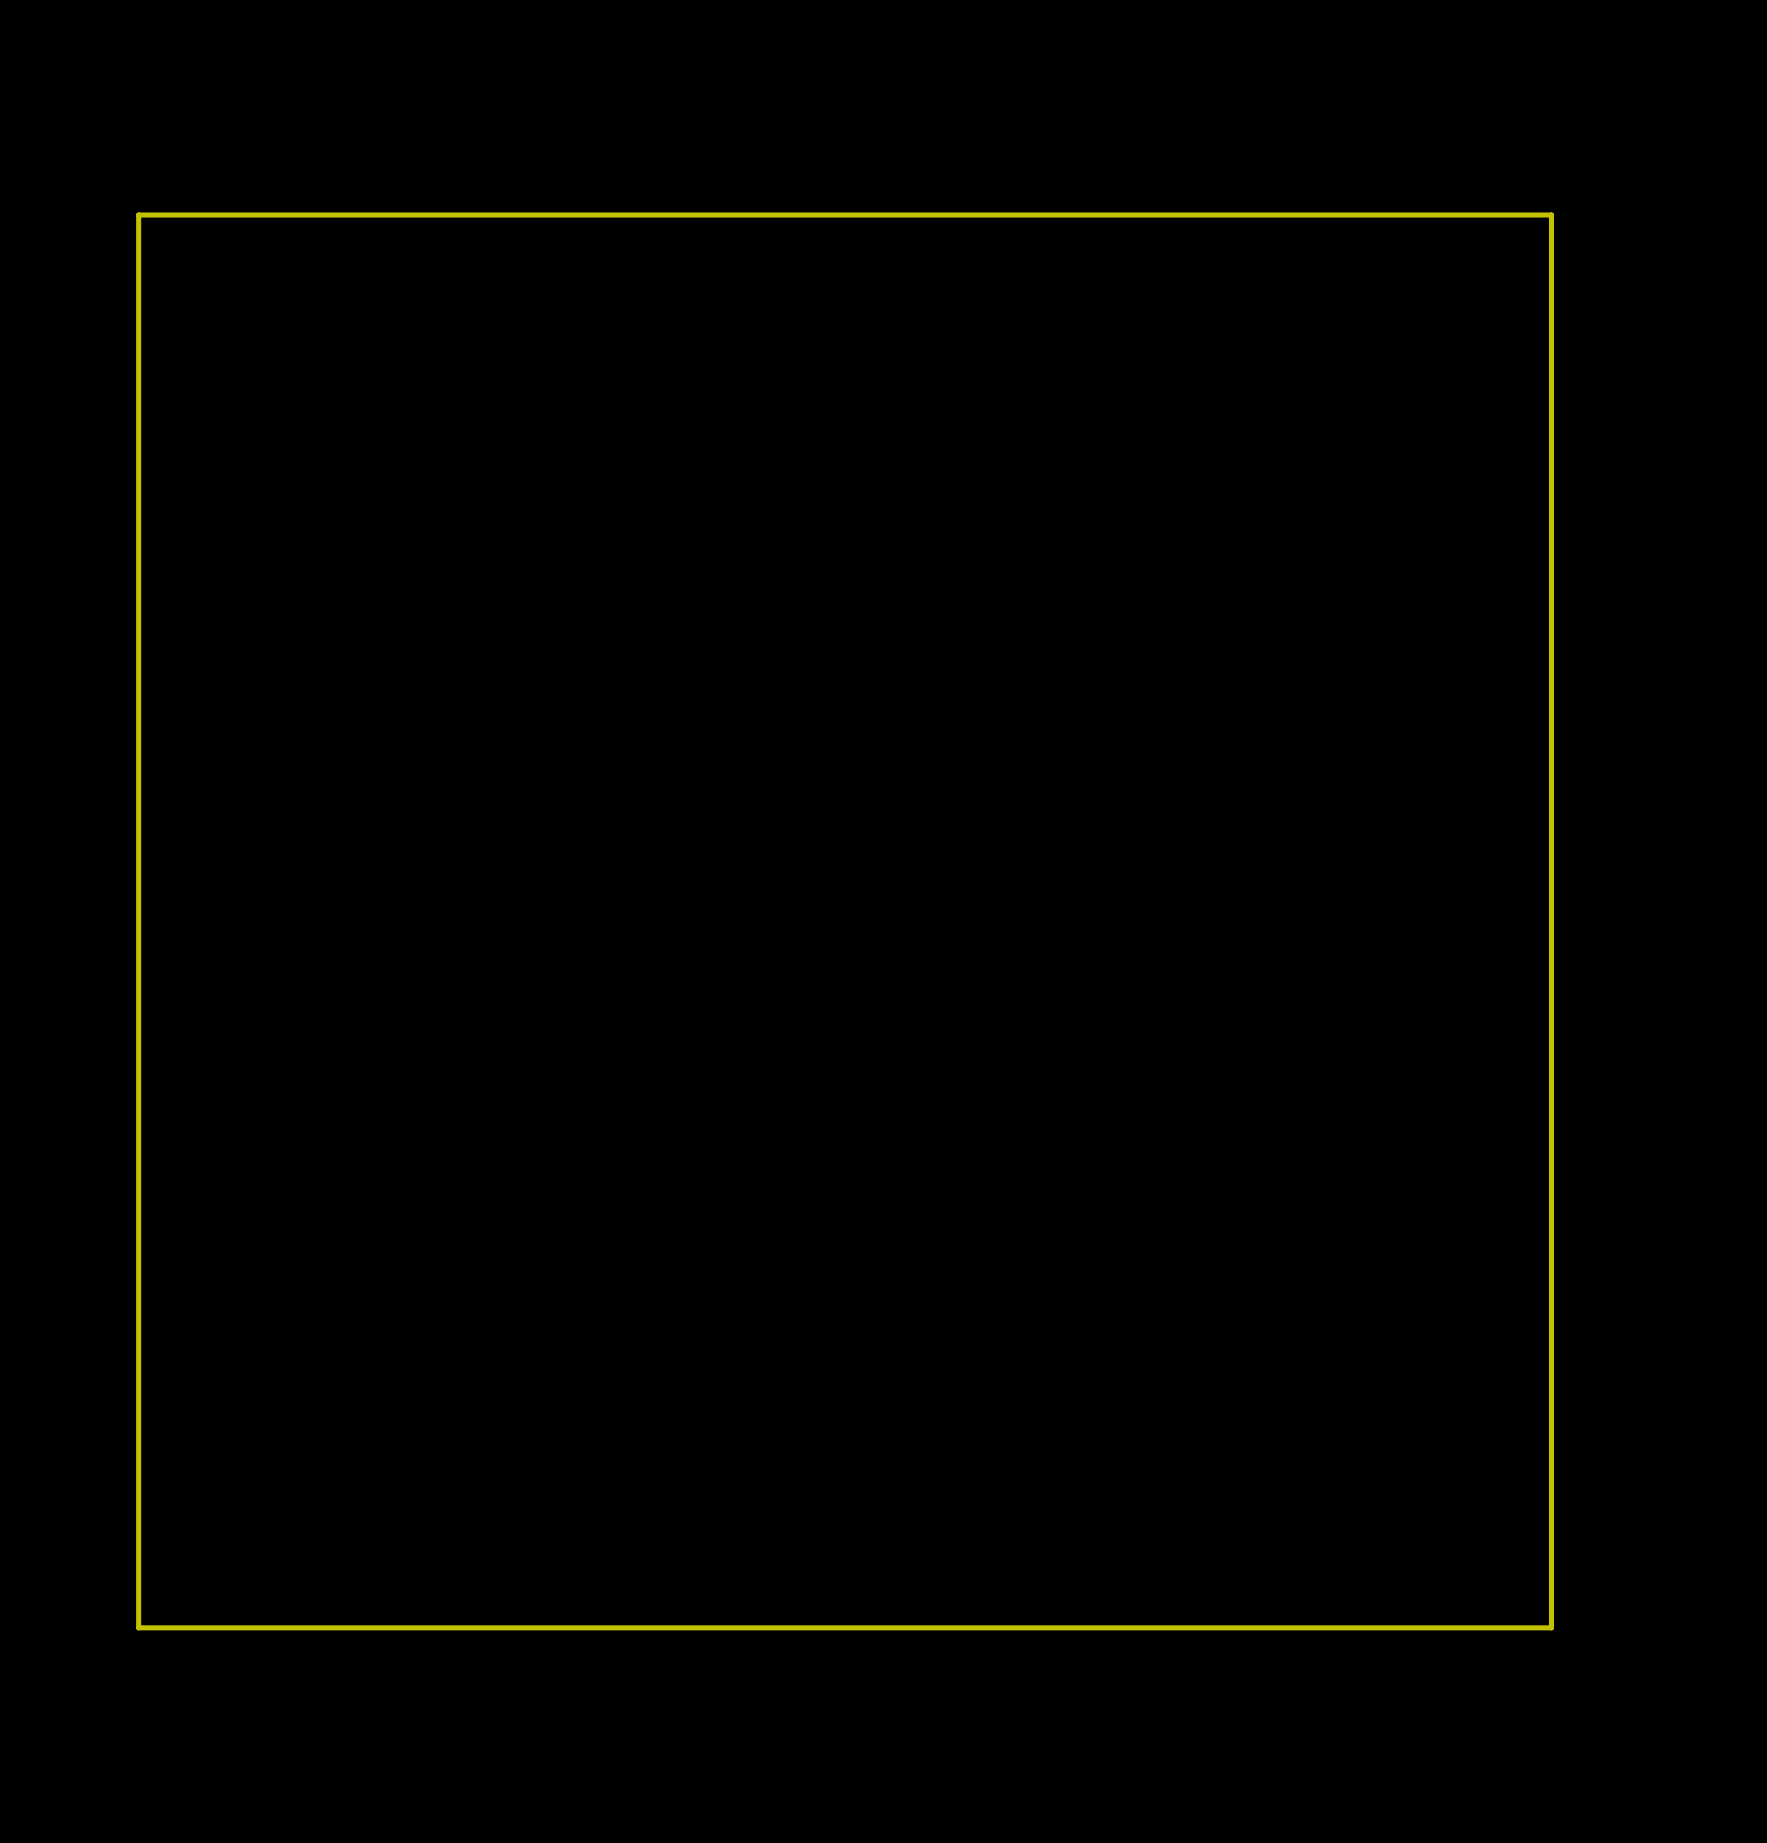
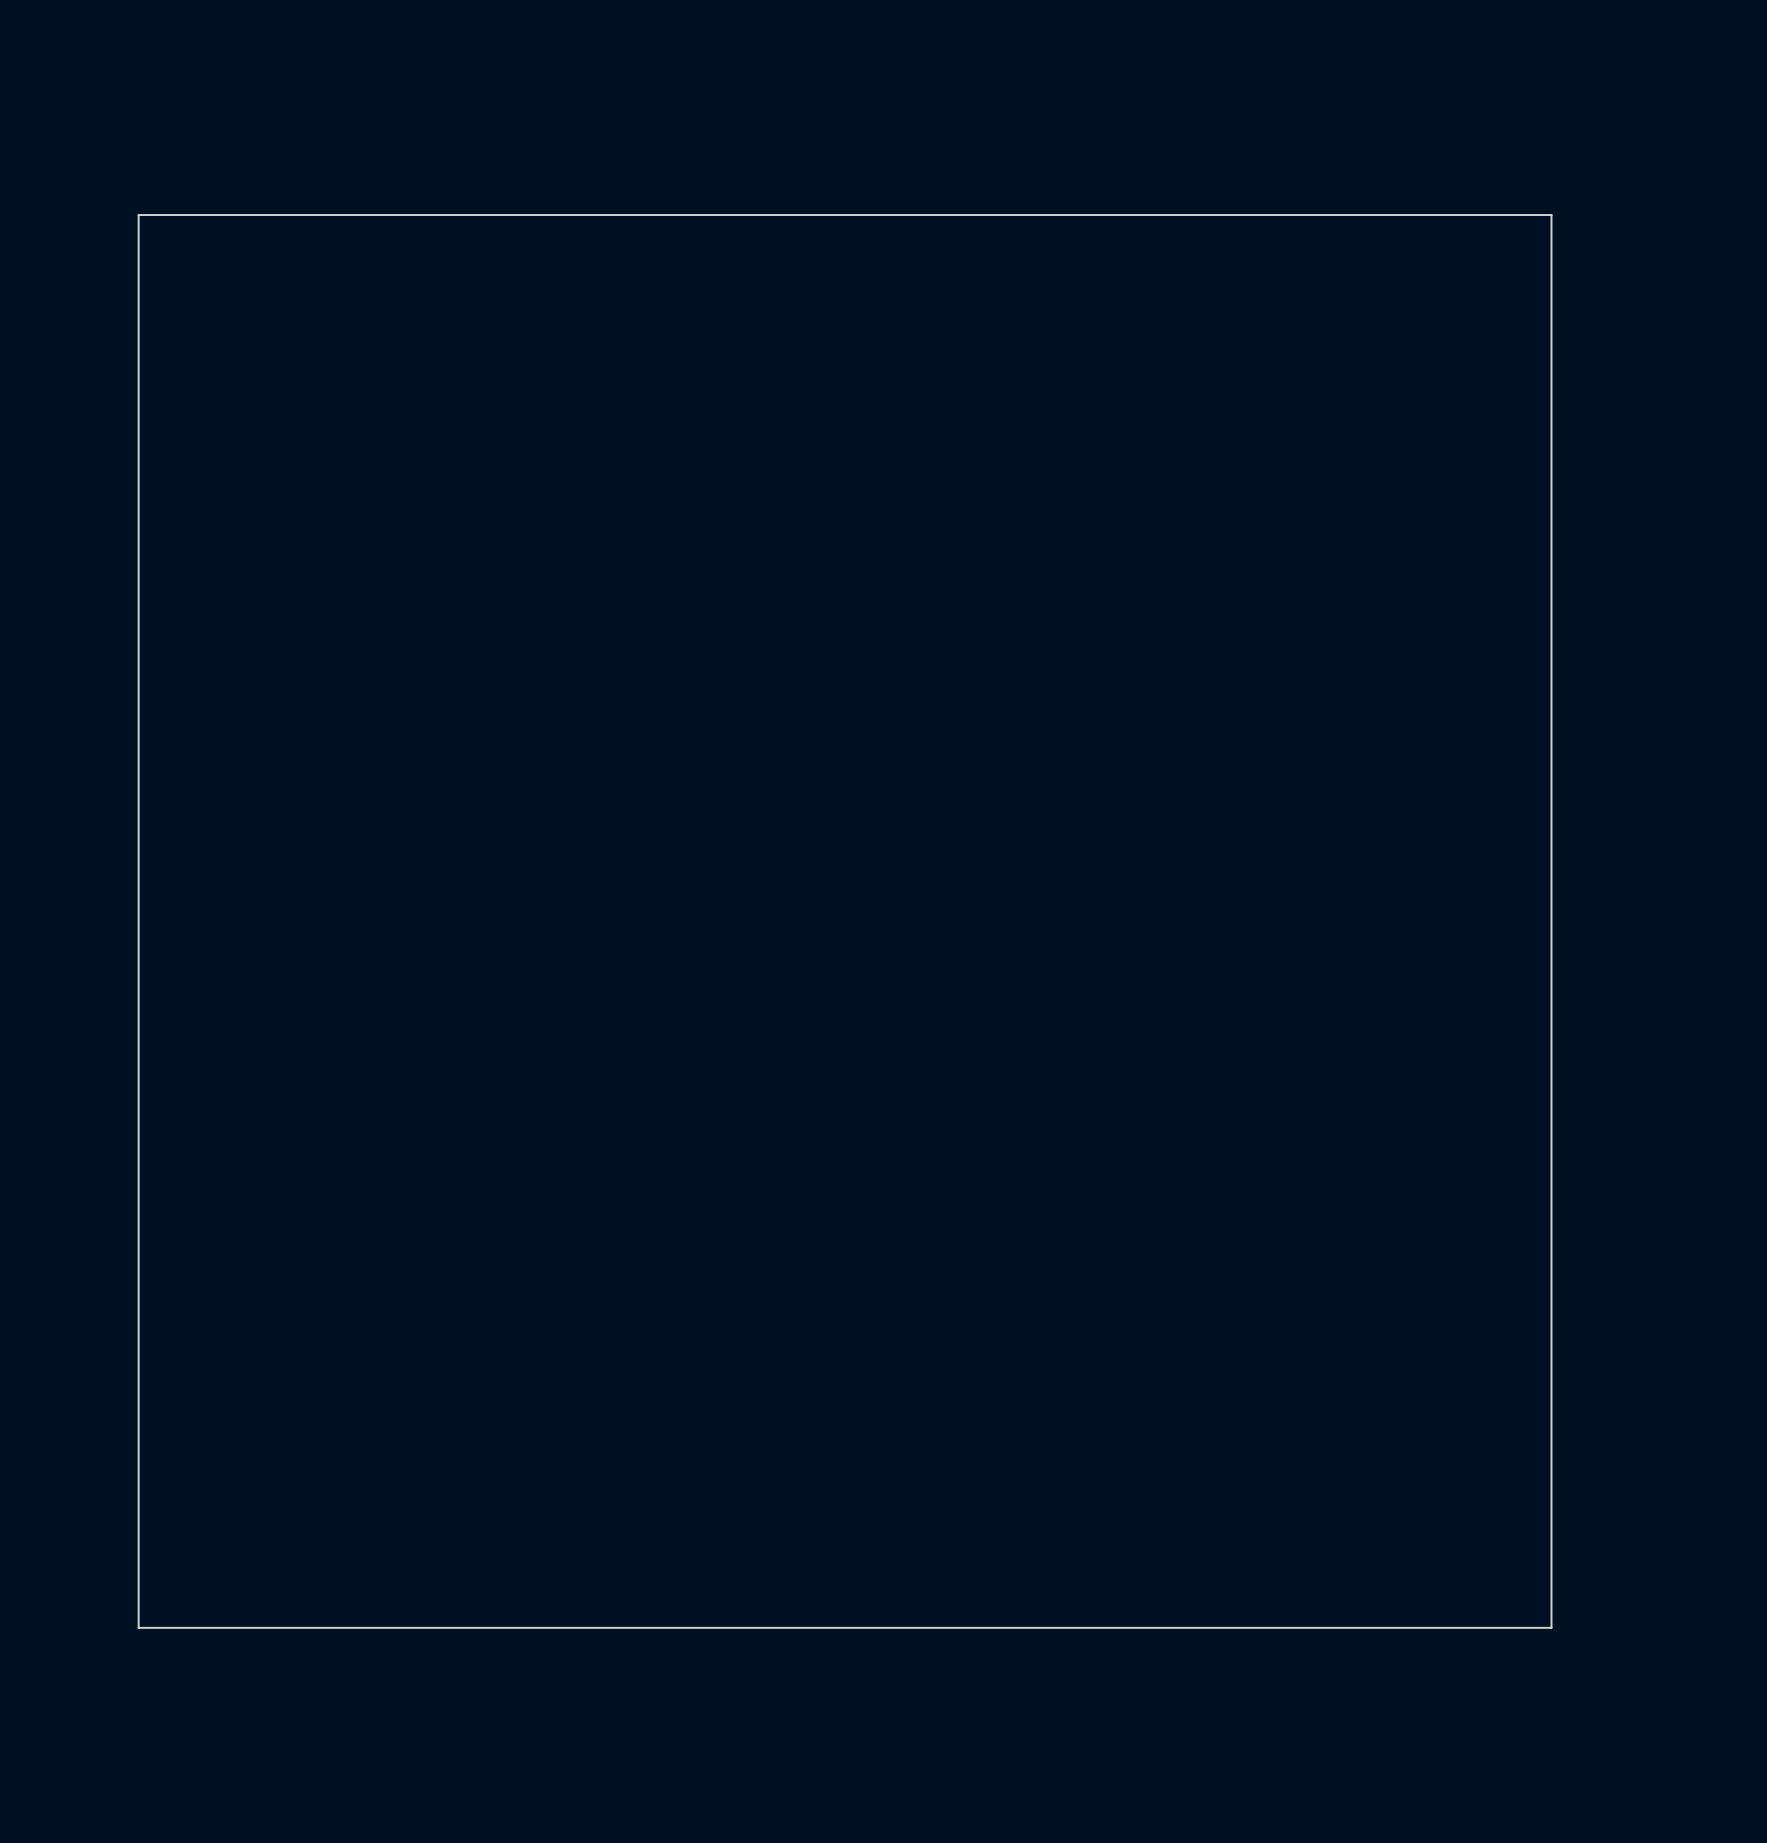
board edge width: thick (1551, 215) (138, 215) (138, 1627) (1551, 1627) (1551, 215) -> thin (1551, 215) (138, 215) (138, 1627) (1551, 1627) (1551, 215)

